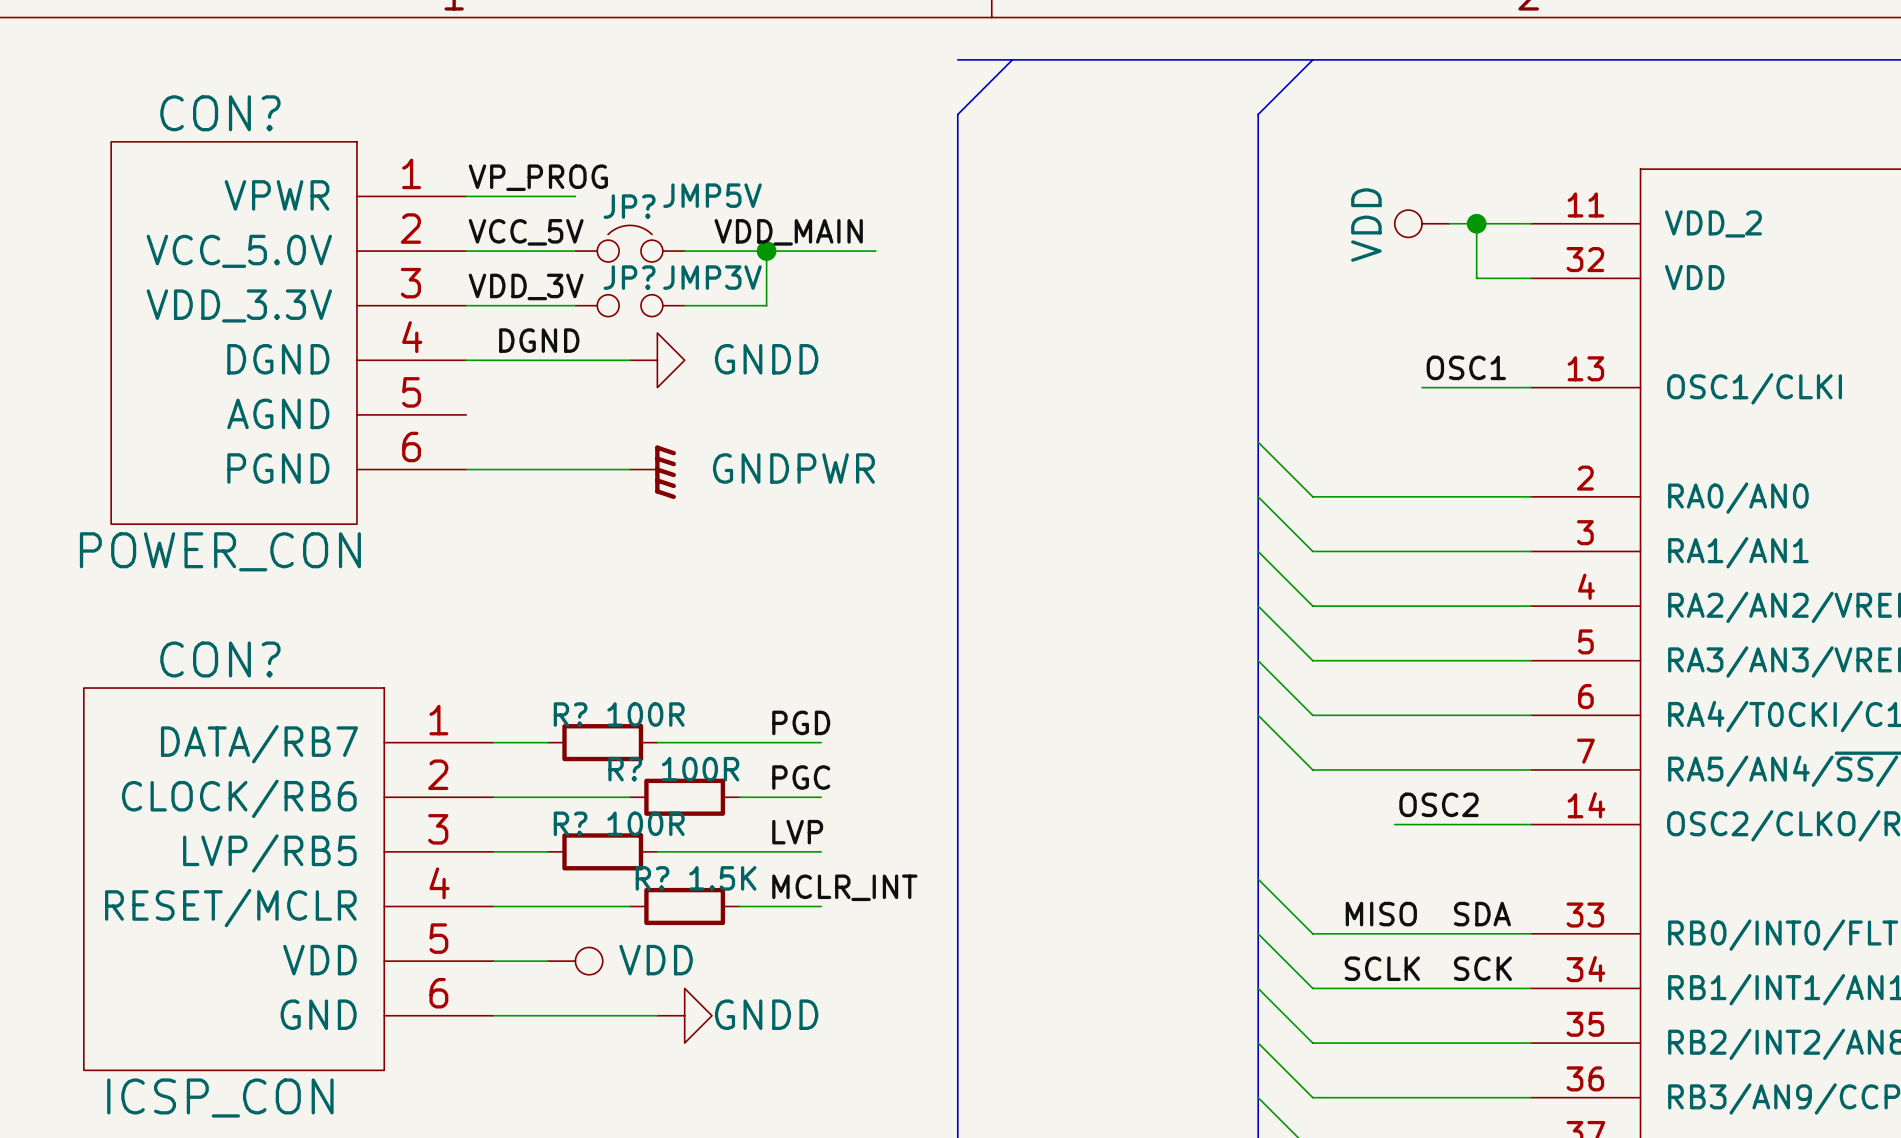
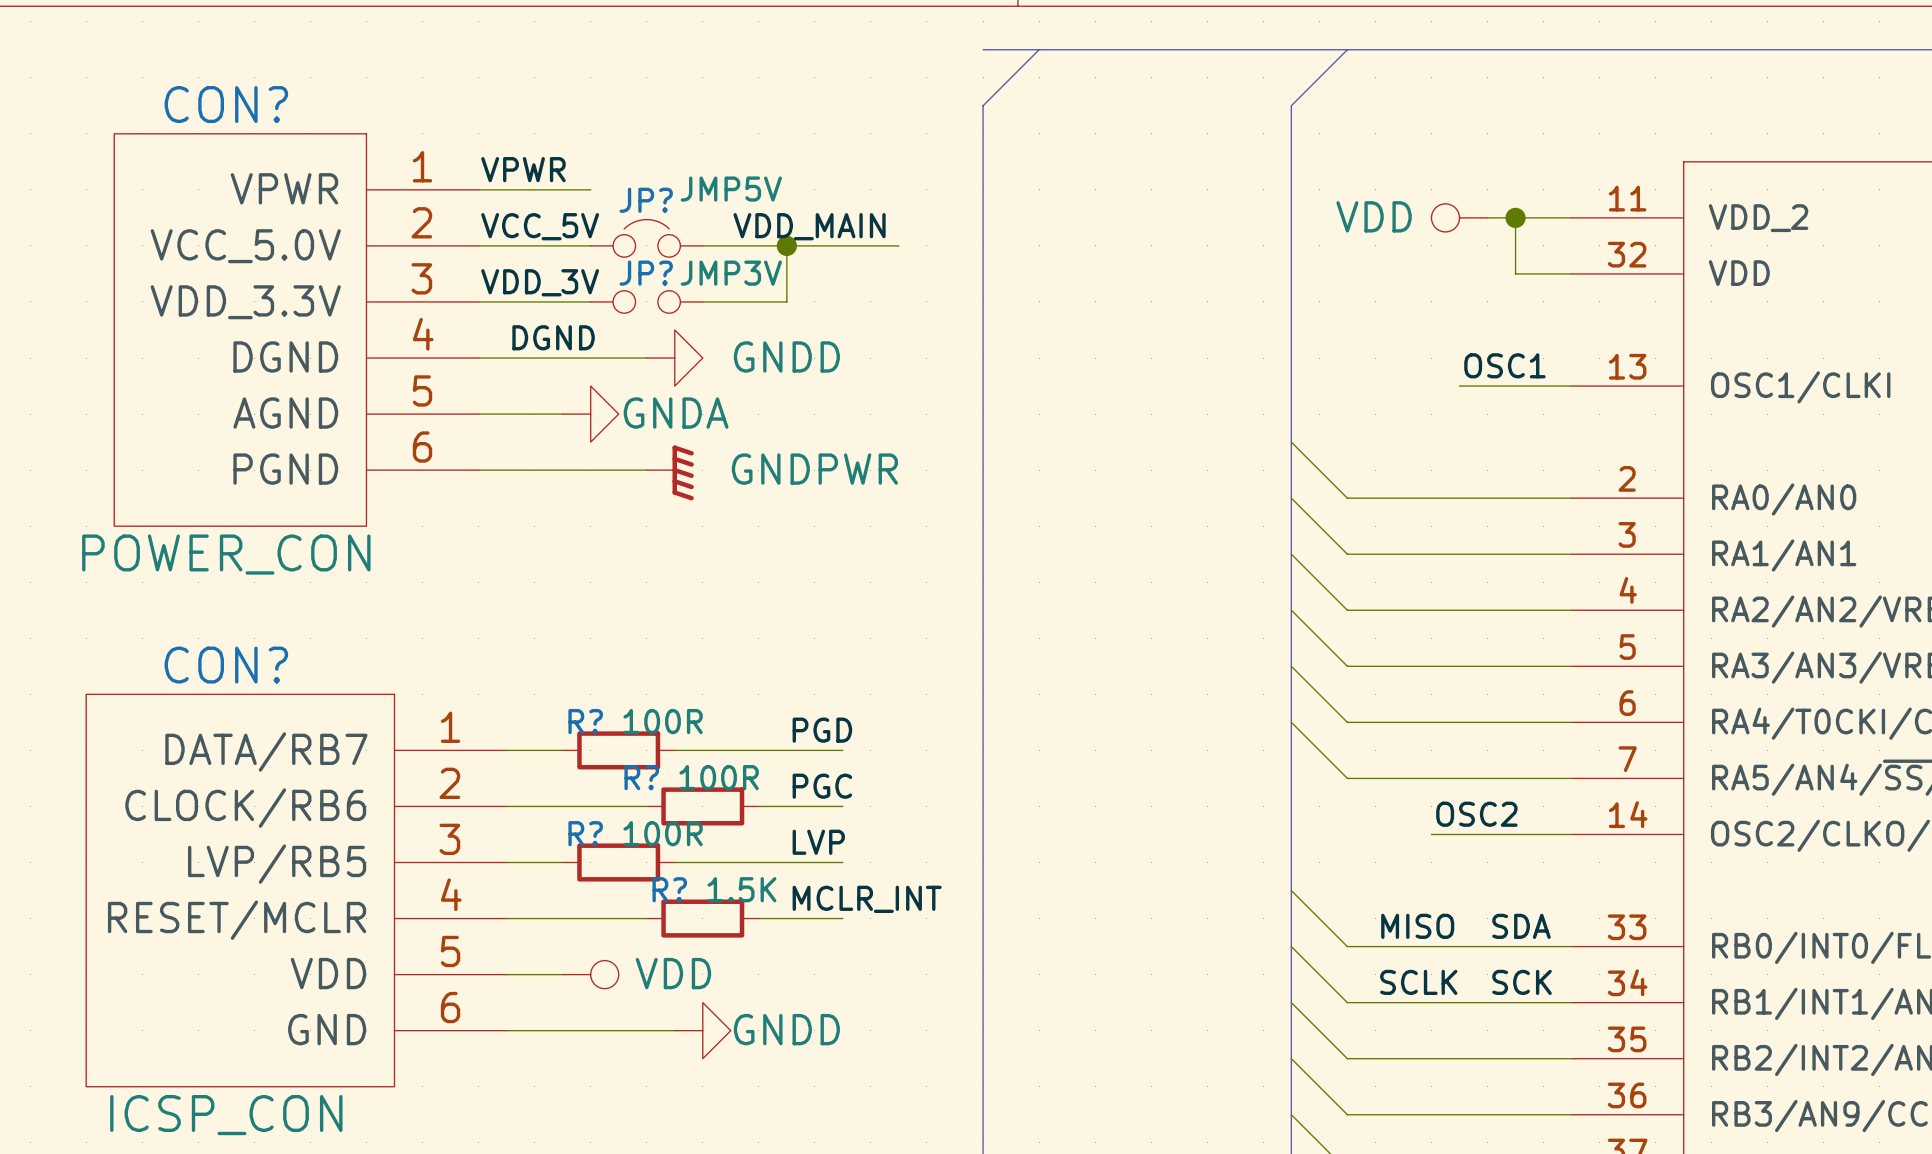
label: VP_PROG (538, 177) -> VPWR (523, 169)
power symbol text rotation: 0° (1366, 225) -> 90° clockwise (1374, 216)
wire: none -> (478, 414) (562, 414)
power symbol: none -> GNDA (590, 414)

